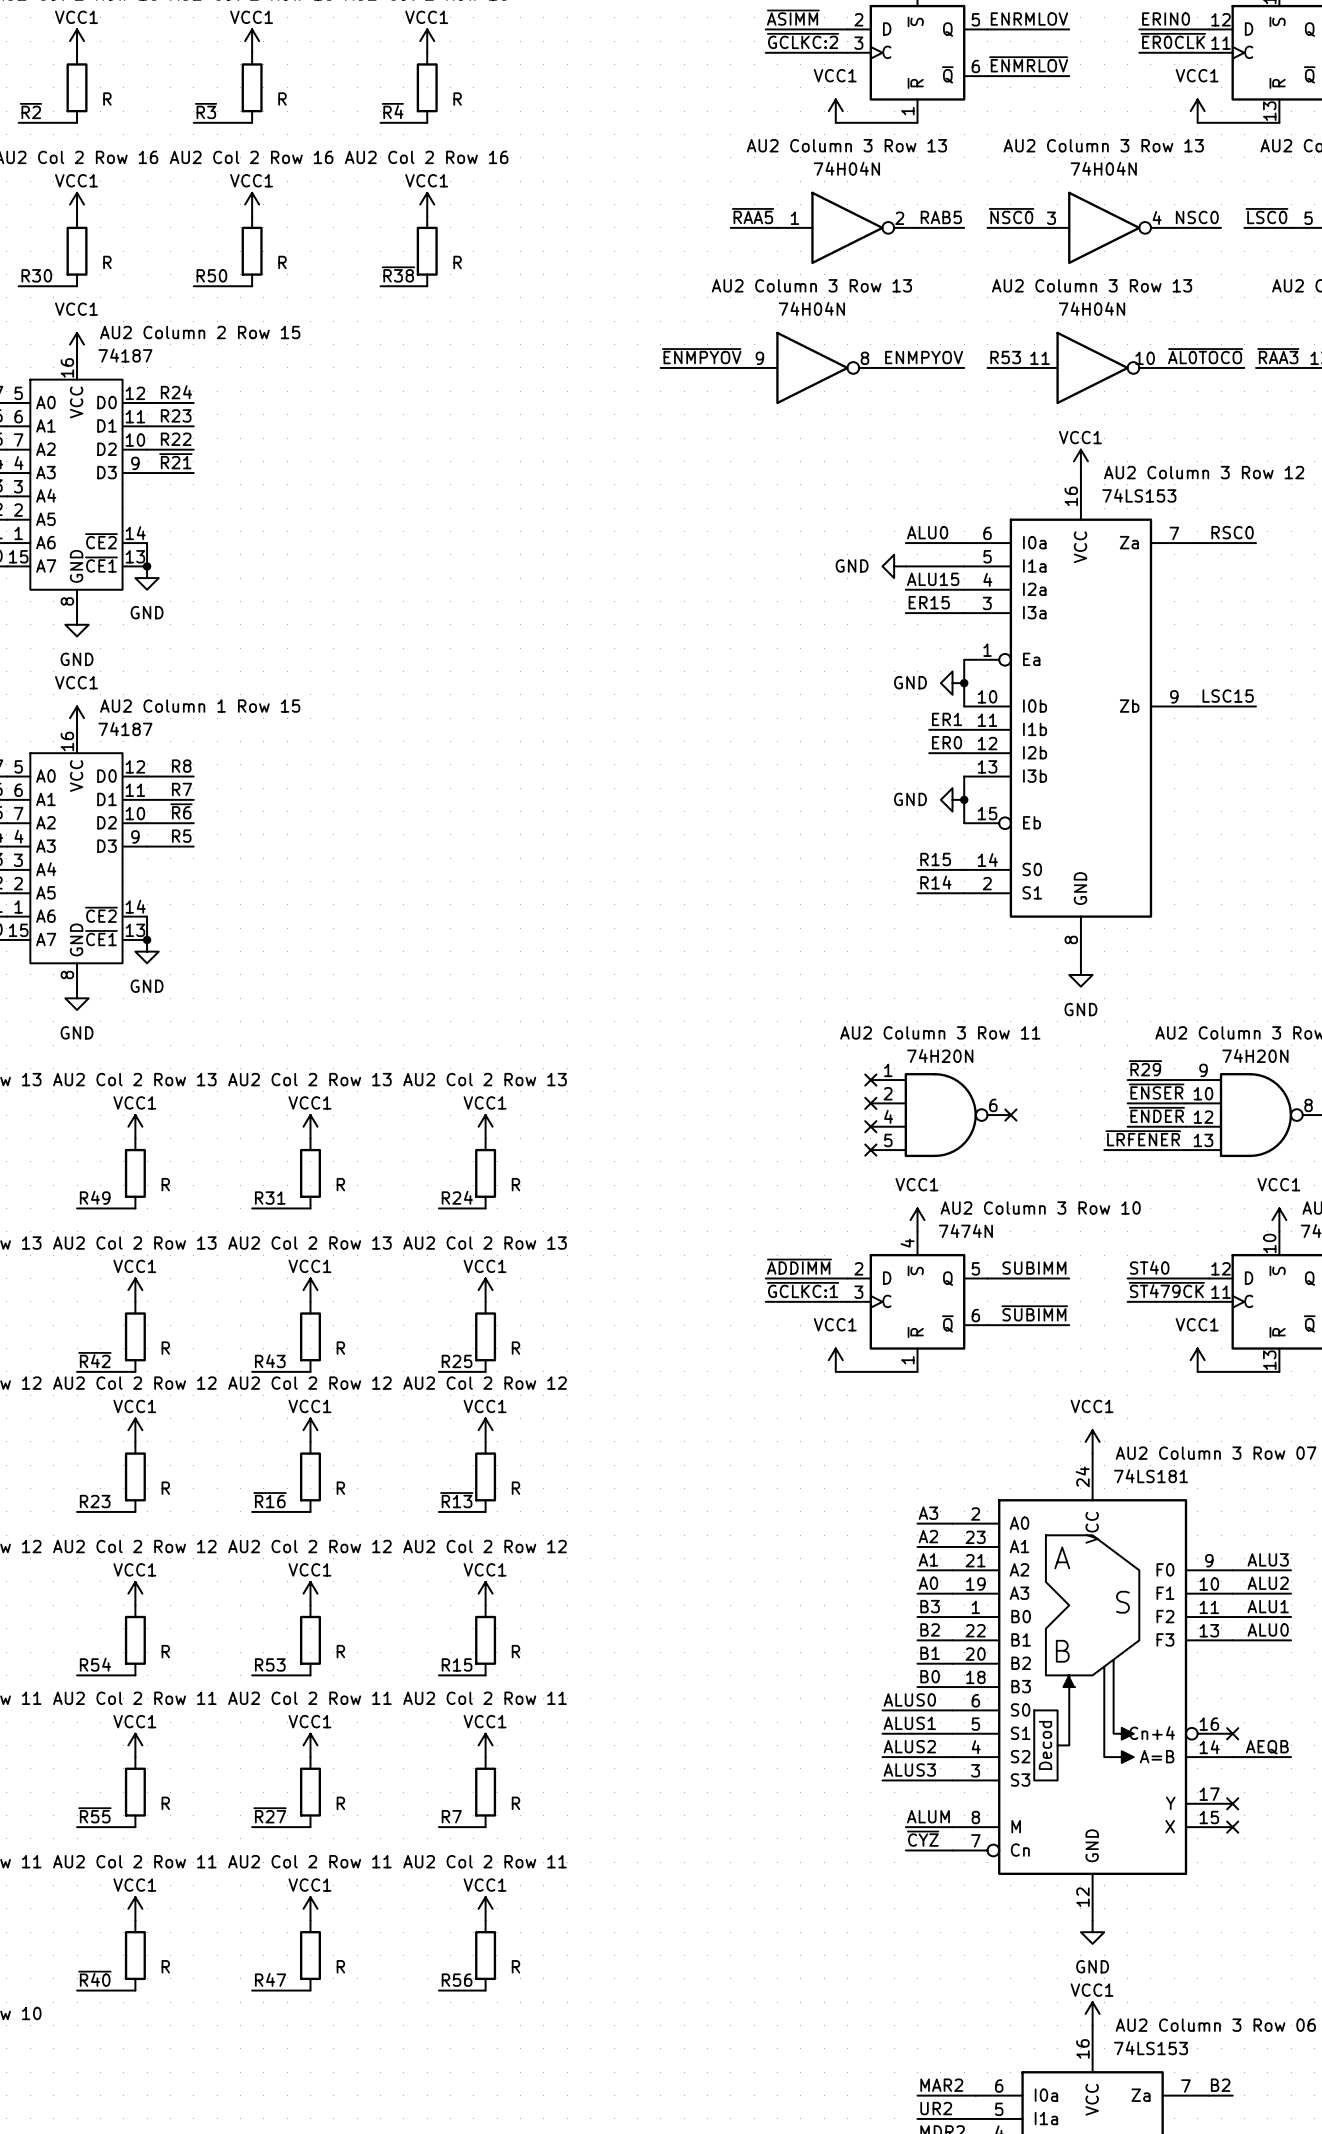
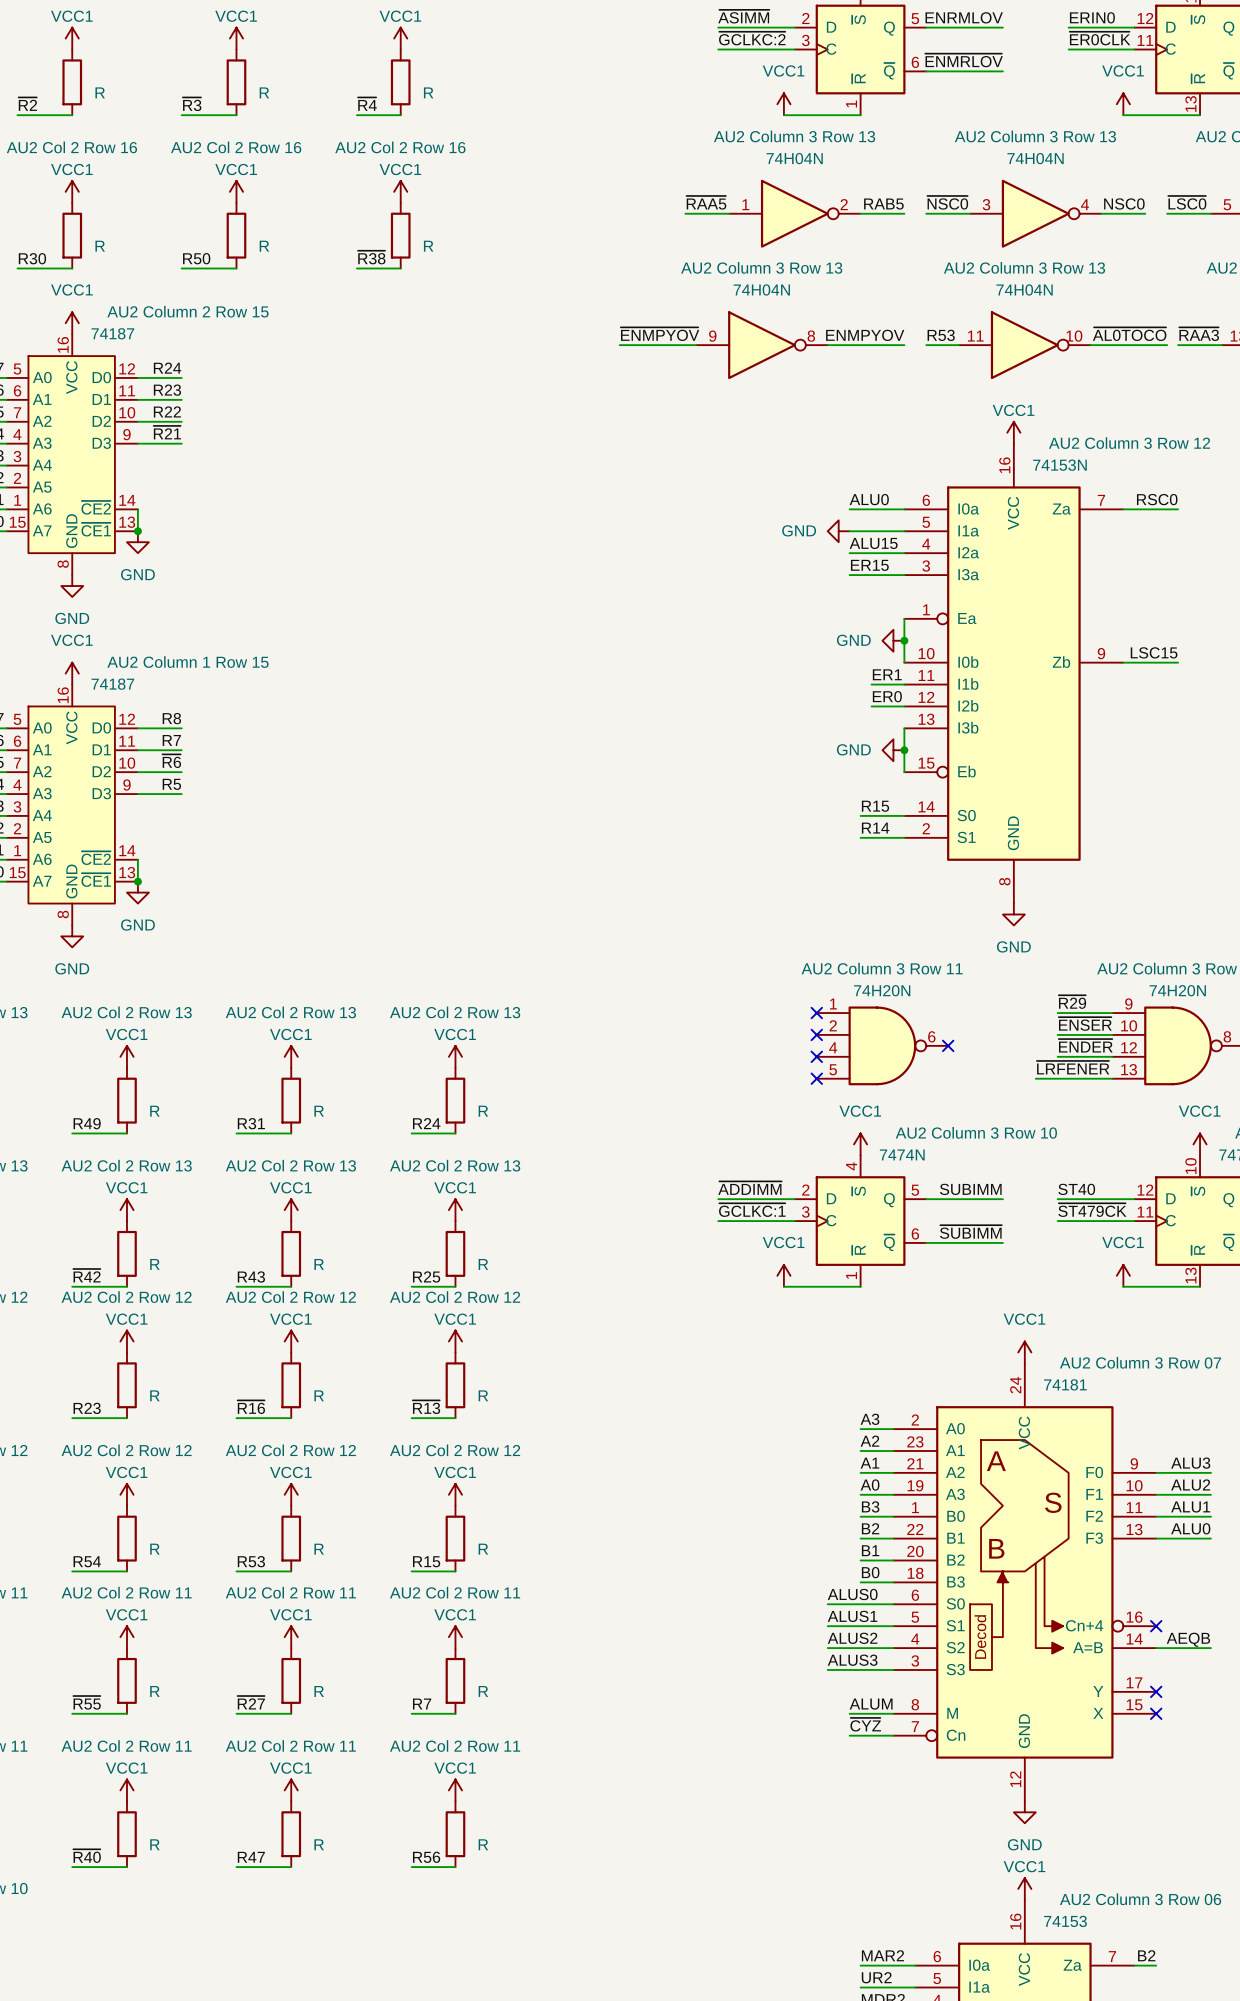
part value: 74LS153 (1139, 495) -> 74153N (1059, 465)
part value: 74LS181 (1151, 1476) -> 74181 (1065, 1384)
part value: 74LS153 (1151, 2048) -> 74153 (1065, 1921)

